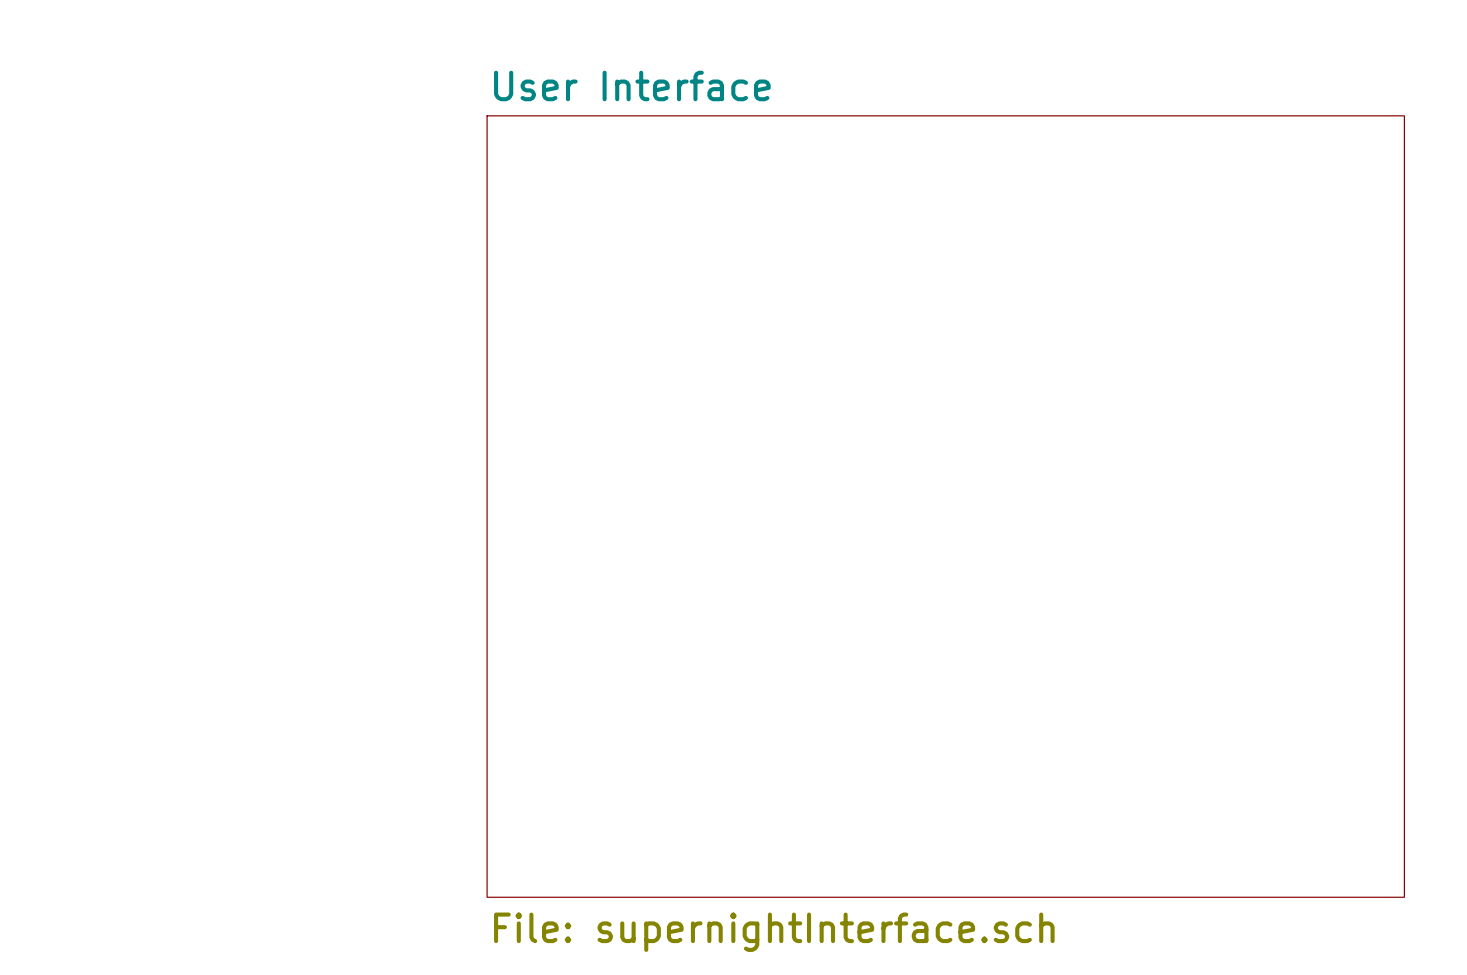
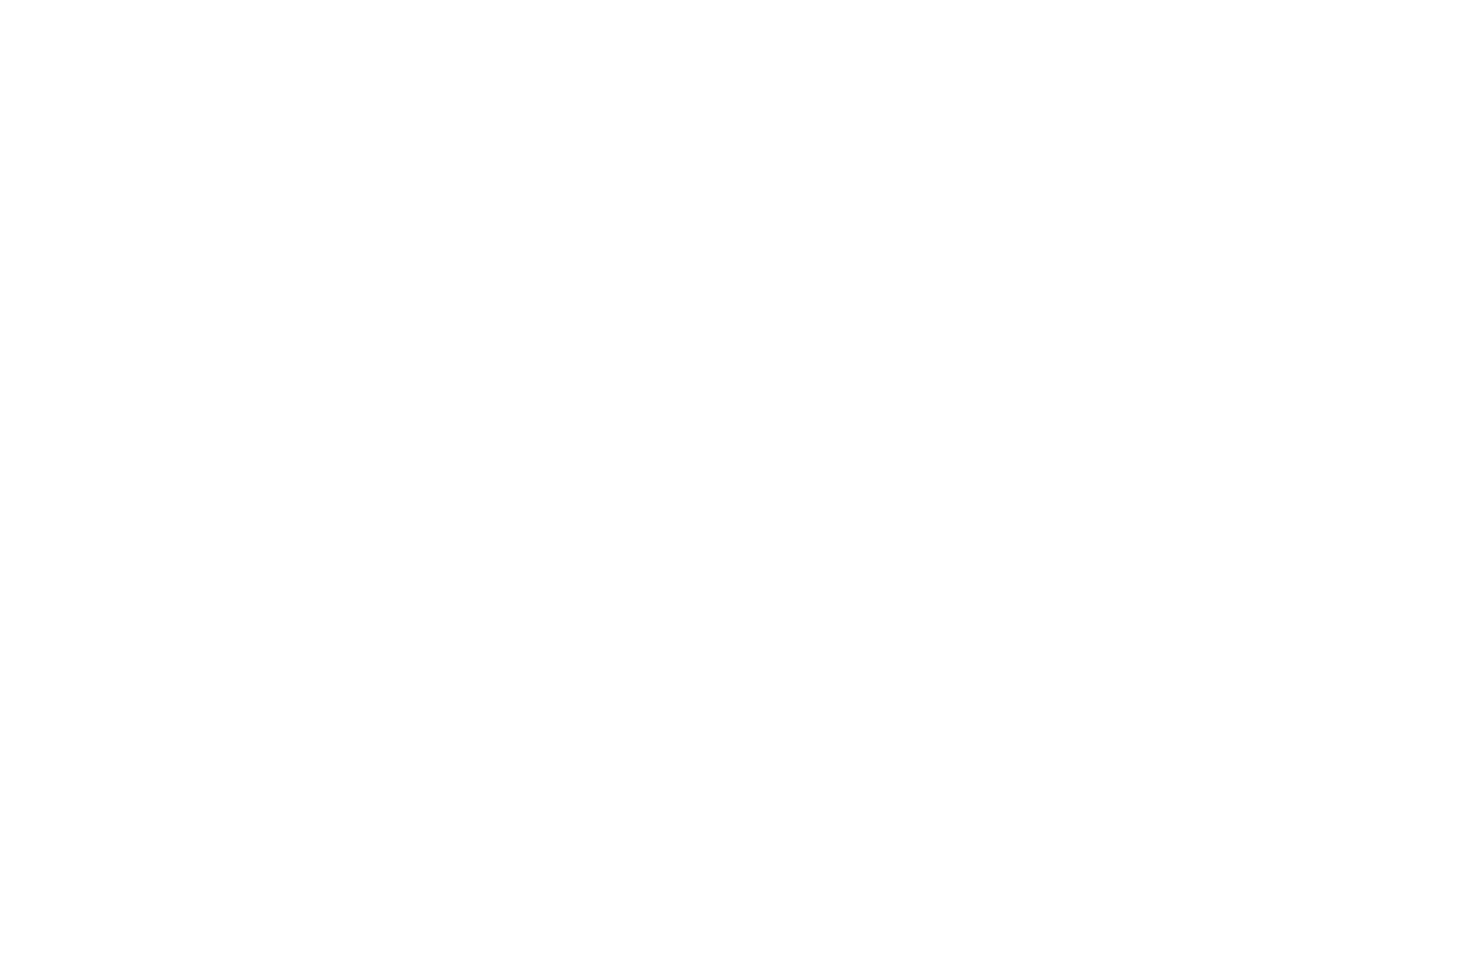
sheet User Interface: File: supernightInterface.sch (945, 506) -> none

